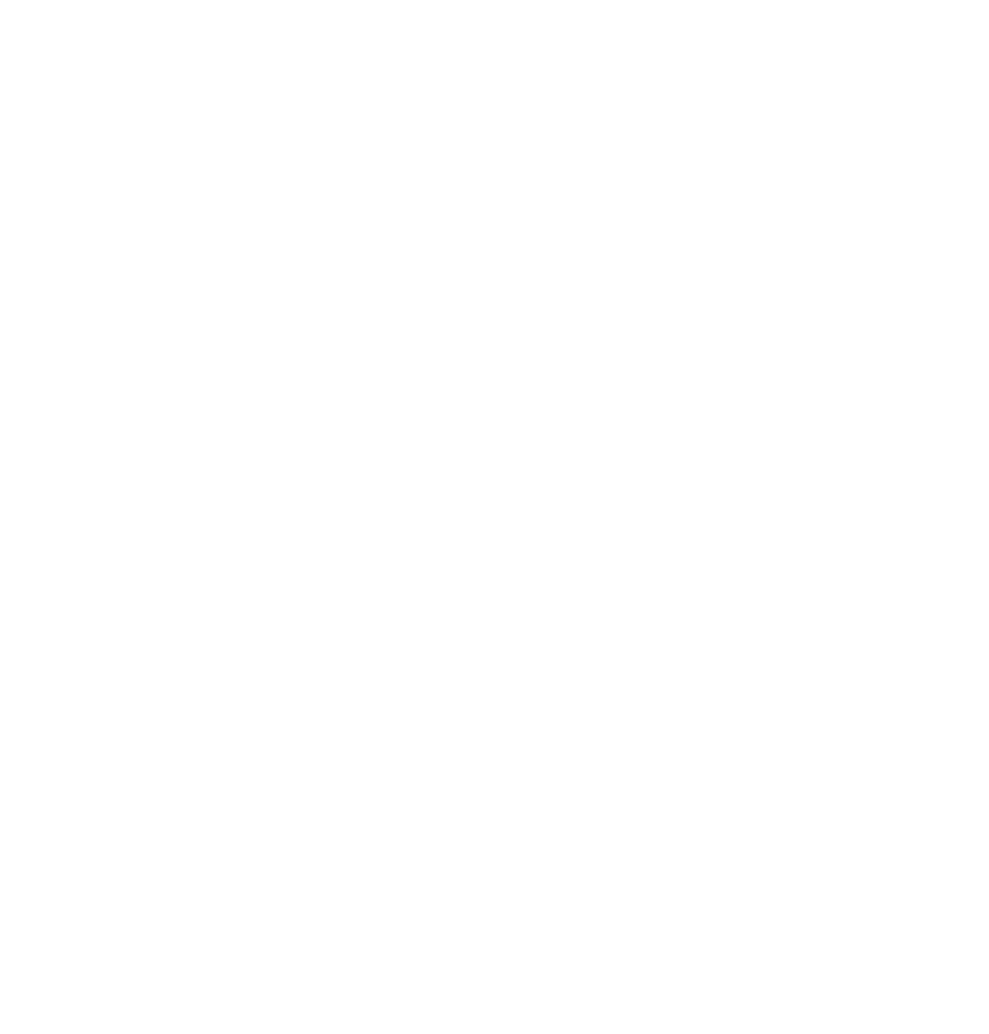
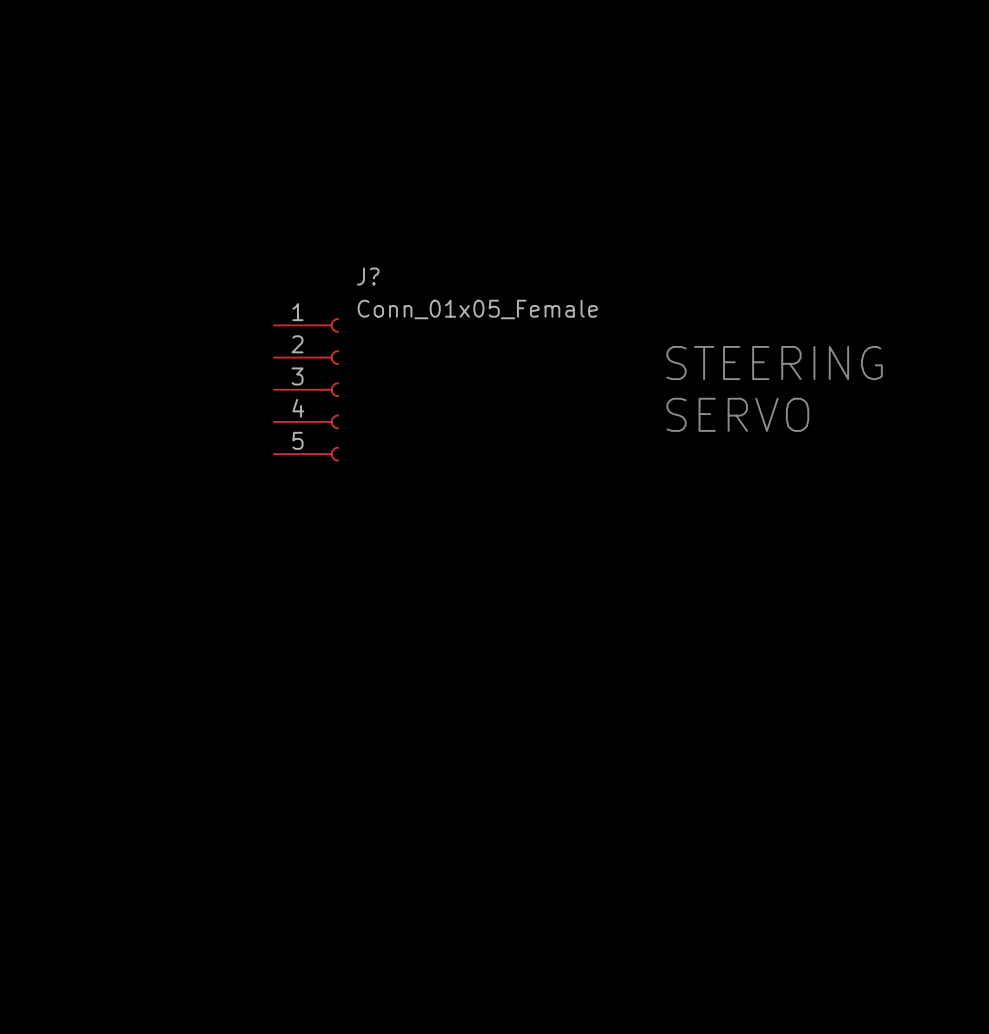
text: none -> STEERING (774, 363)
J?: none -> Conn_01x05_Female (306, 389)
text: none -> SERVO (737, 414)

